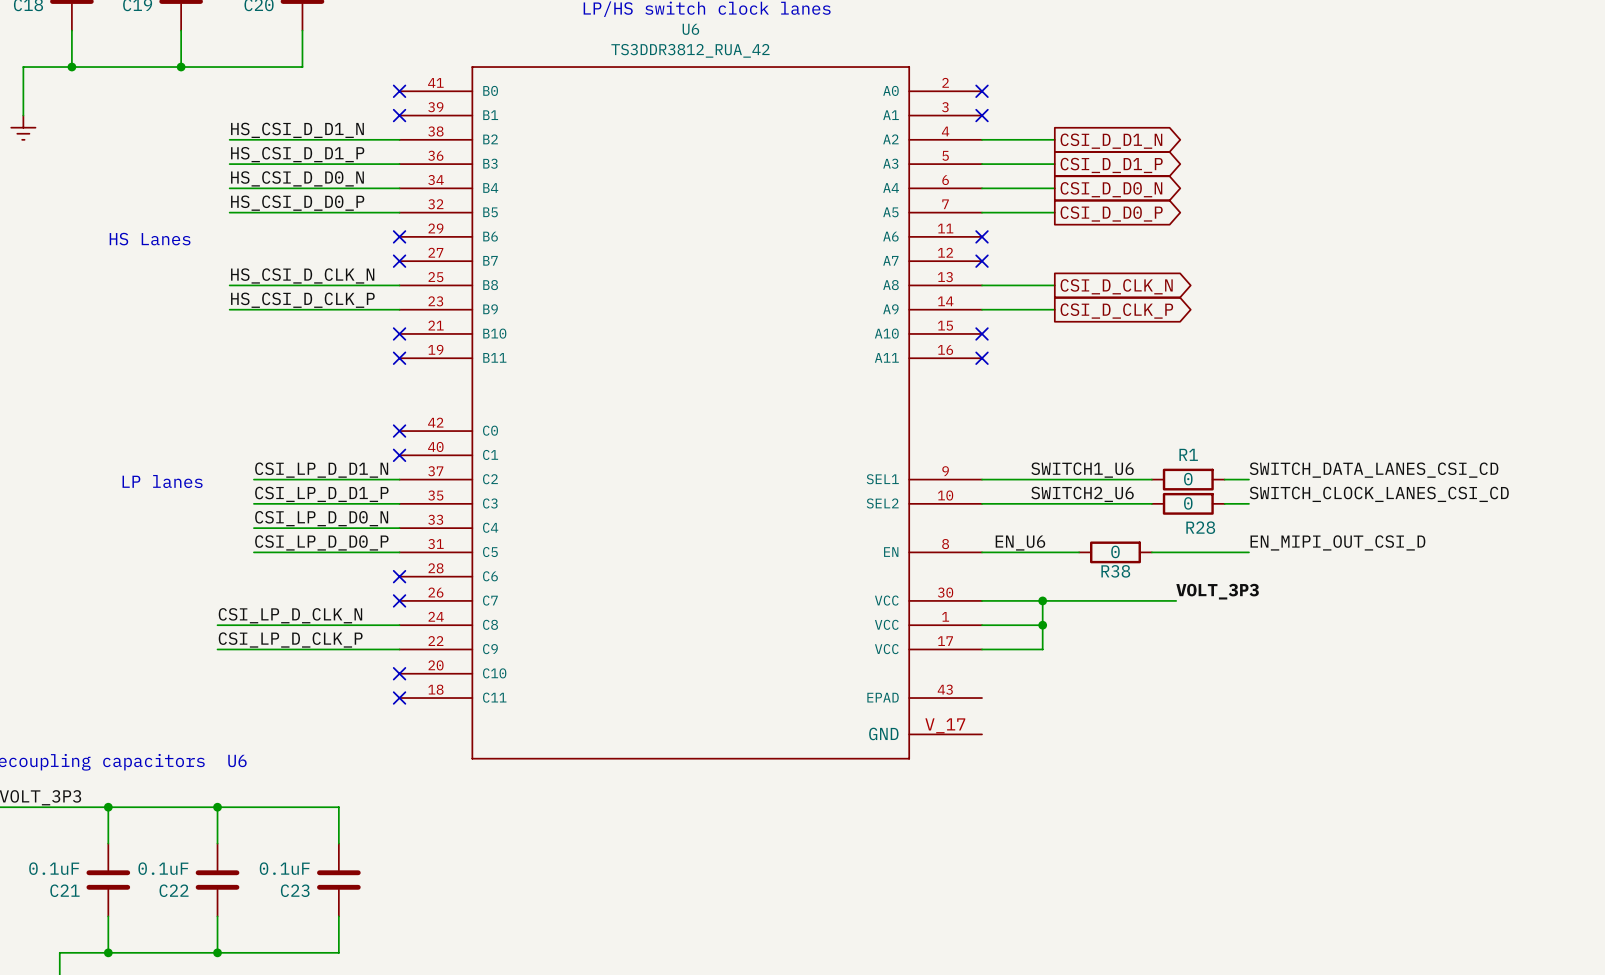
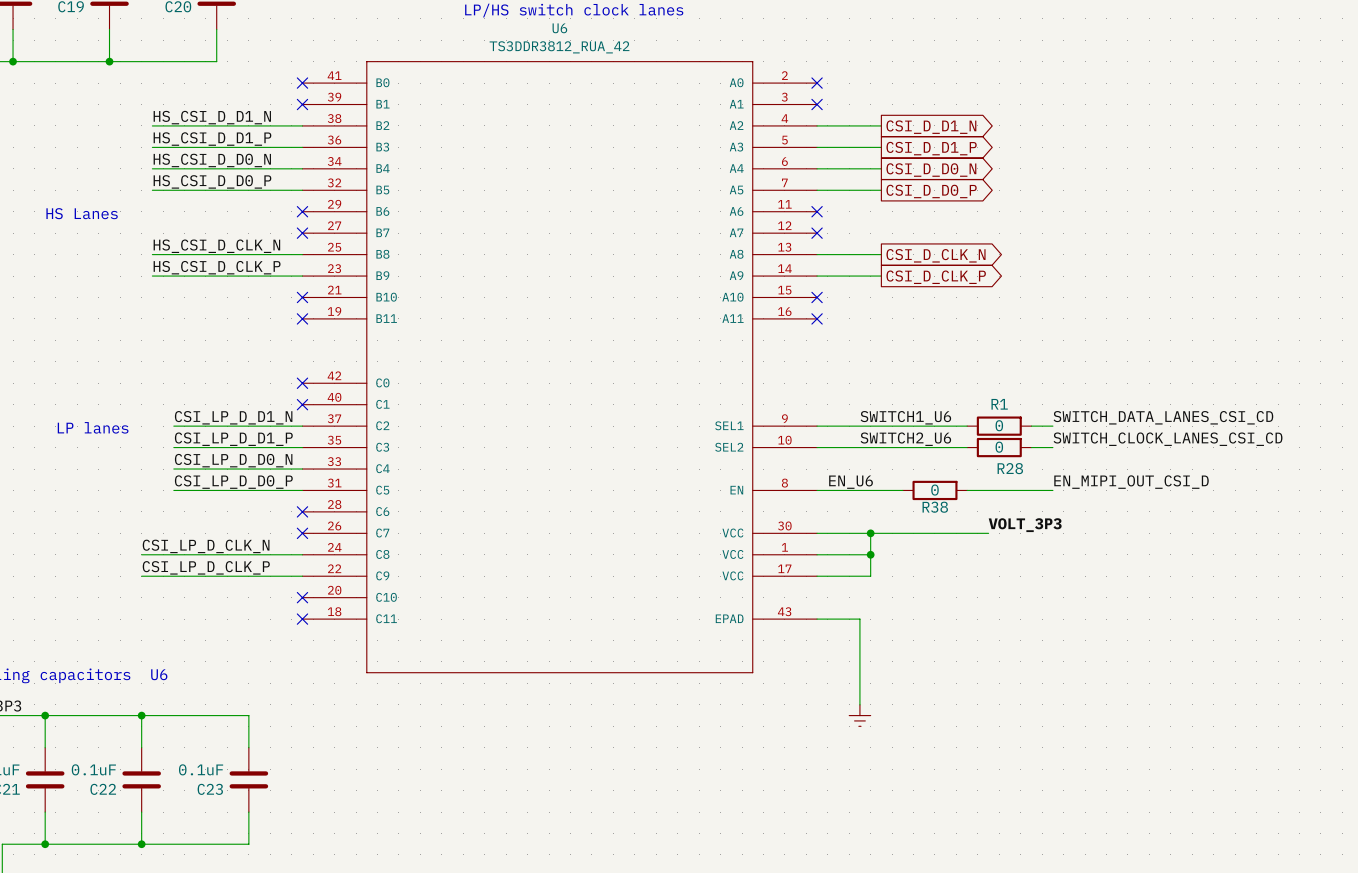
U6 symbol: [399, 67, 983, 759] -> [302, 61, 818, 673]
wire: none -> (817, 619) (859, 619) (859, 704)
power symbol: none -> (859, 715)

